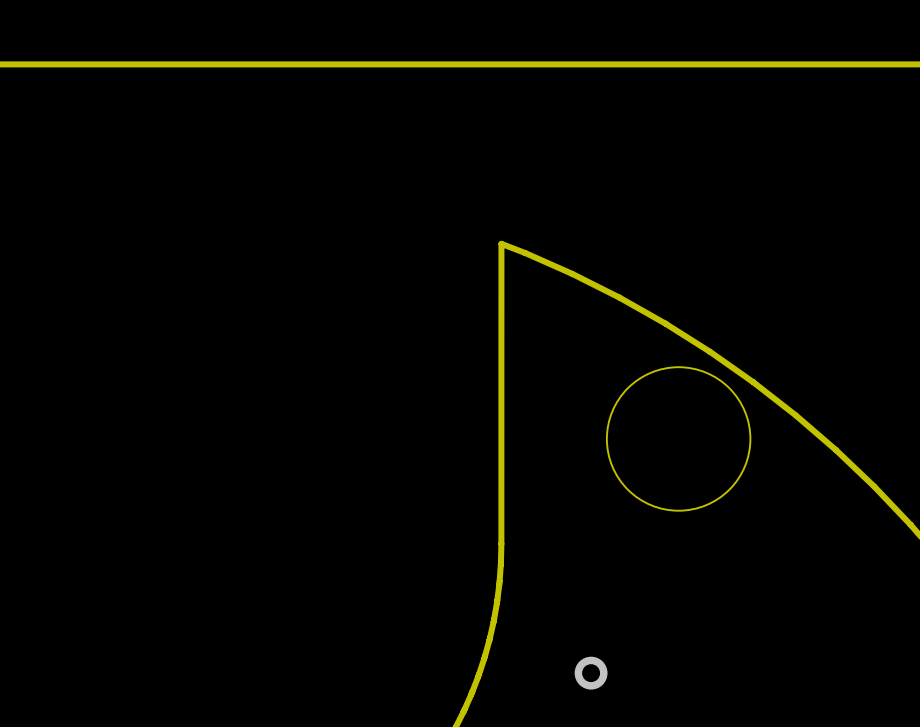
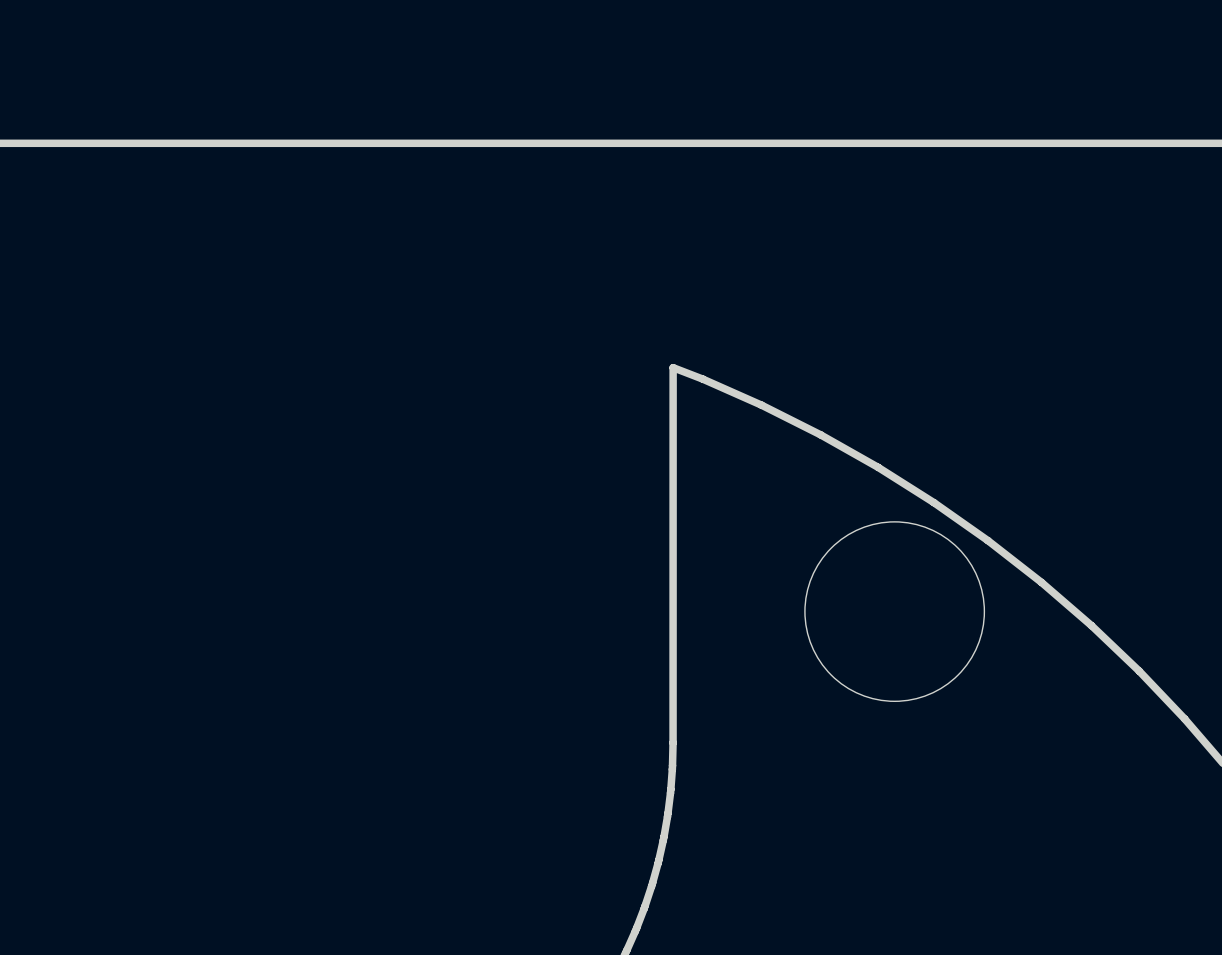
via: (591, 673) -> none

